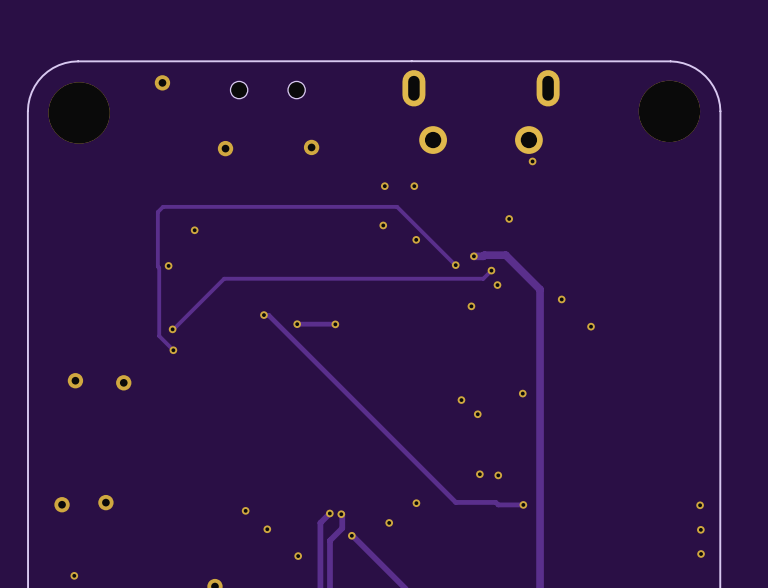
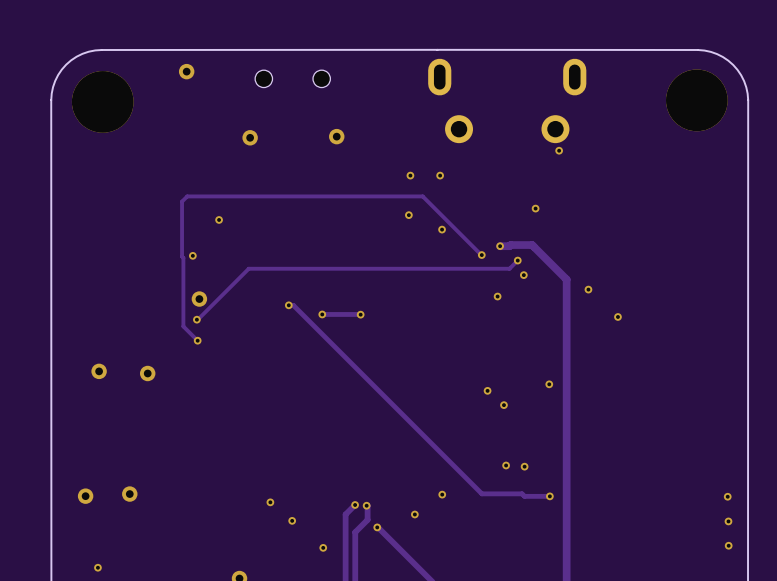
via: none -> (199, 299)

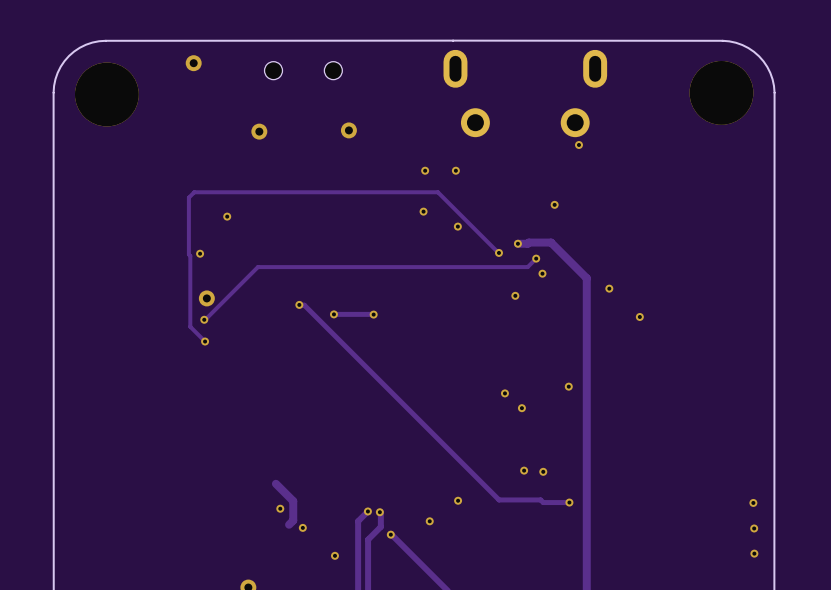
via: (99, 371) -> none
via: (147, 373) -> none
track: none -> (275, 483) (293, 501) (293, 520) (289, 524)
via: (129, 494) -> none
via: (85, 496) -> none
via: (97, 567) -> none

